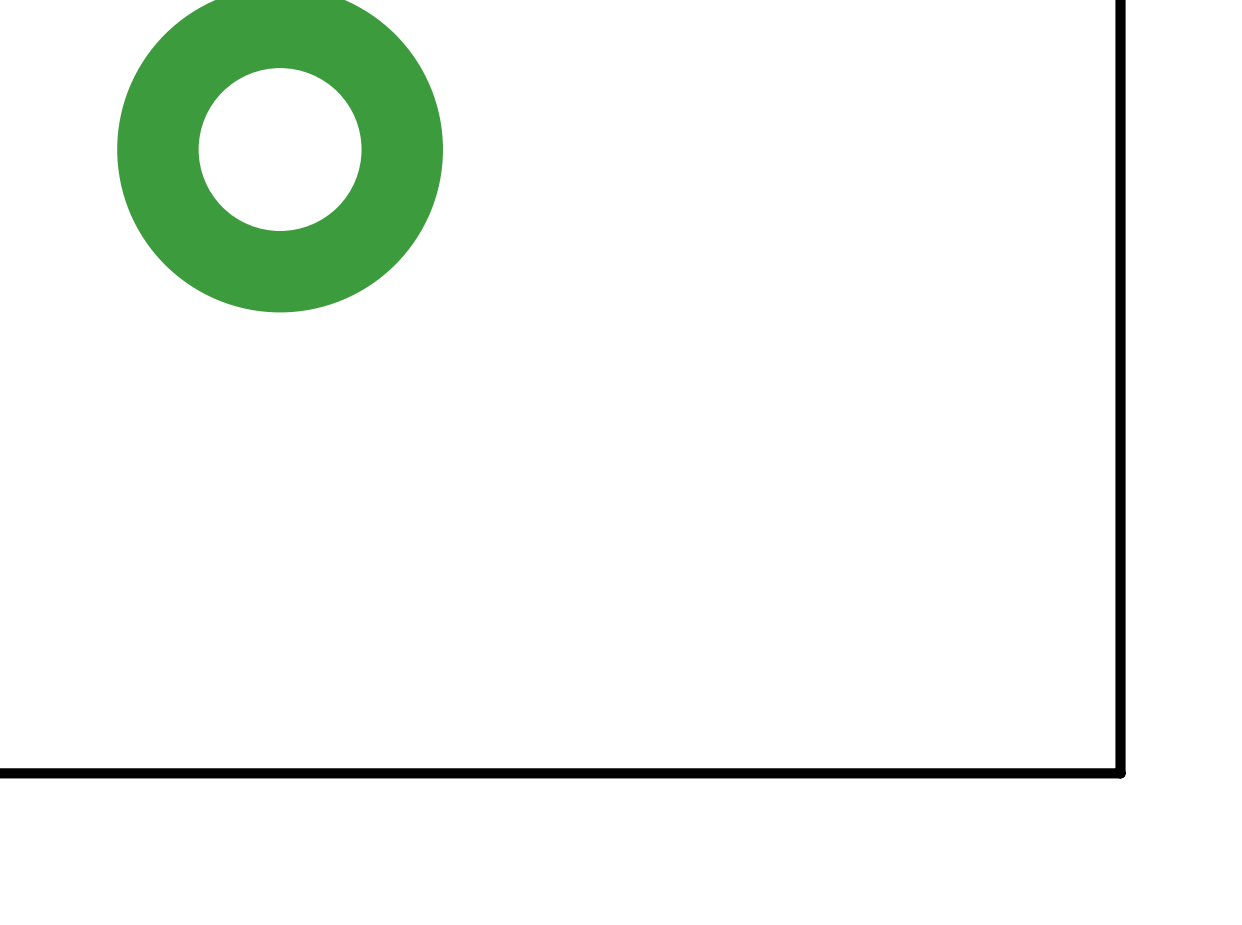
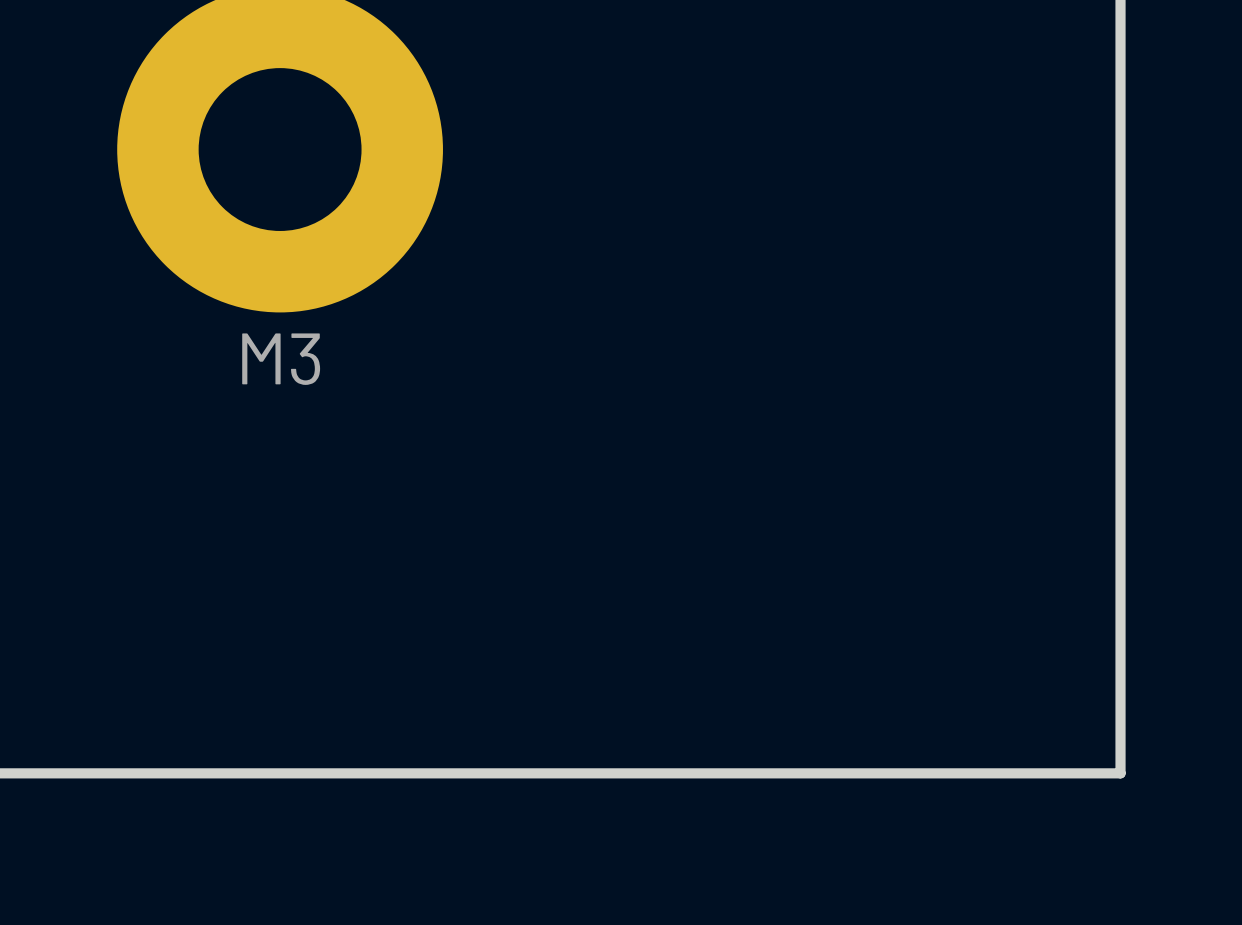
part value: none -> M3 (281, 359)

